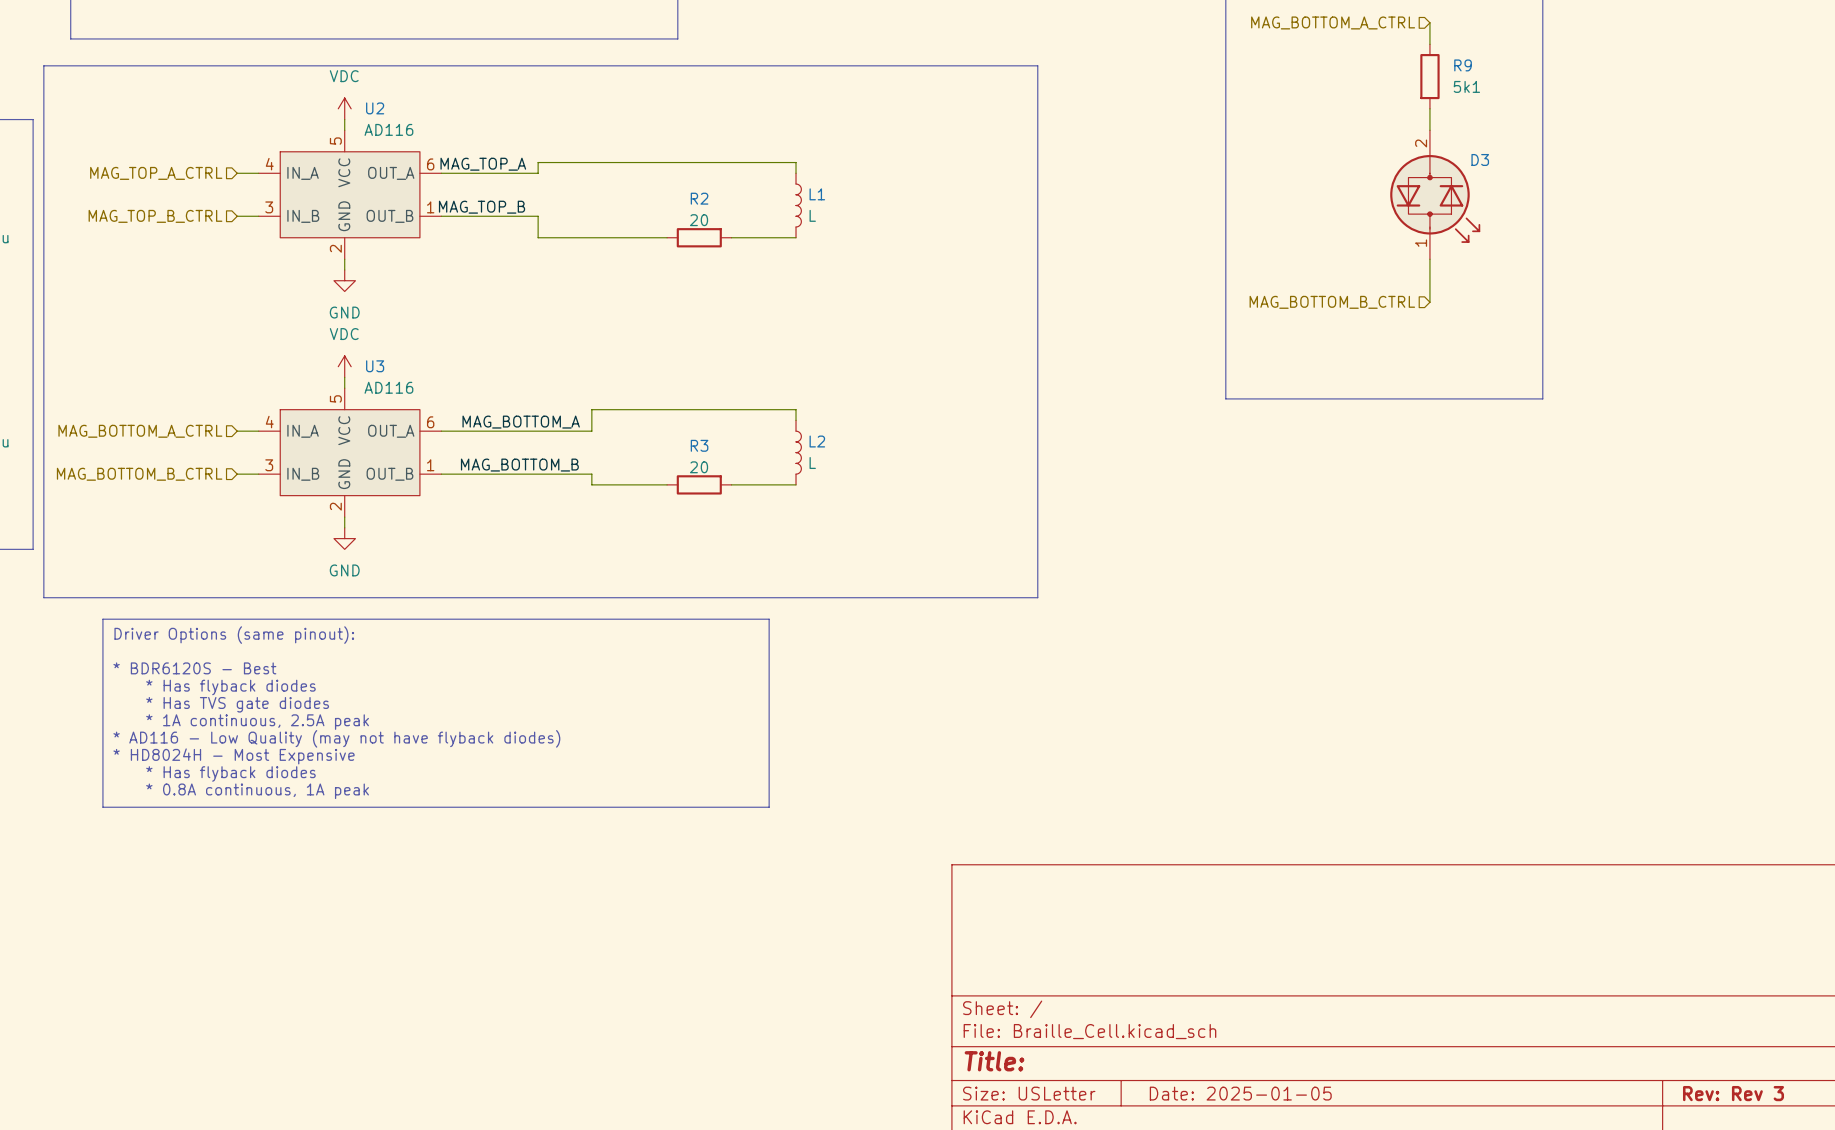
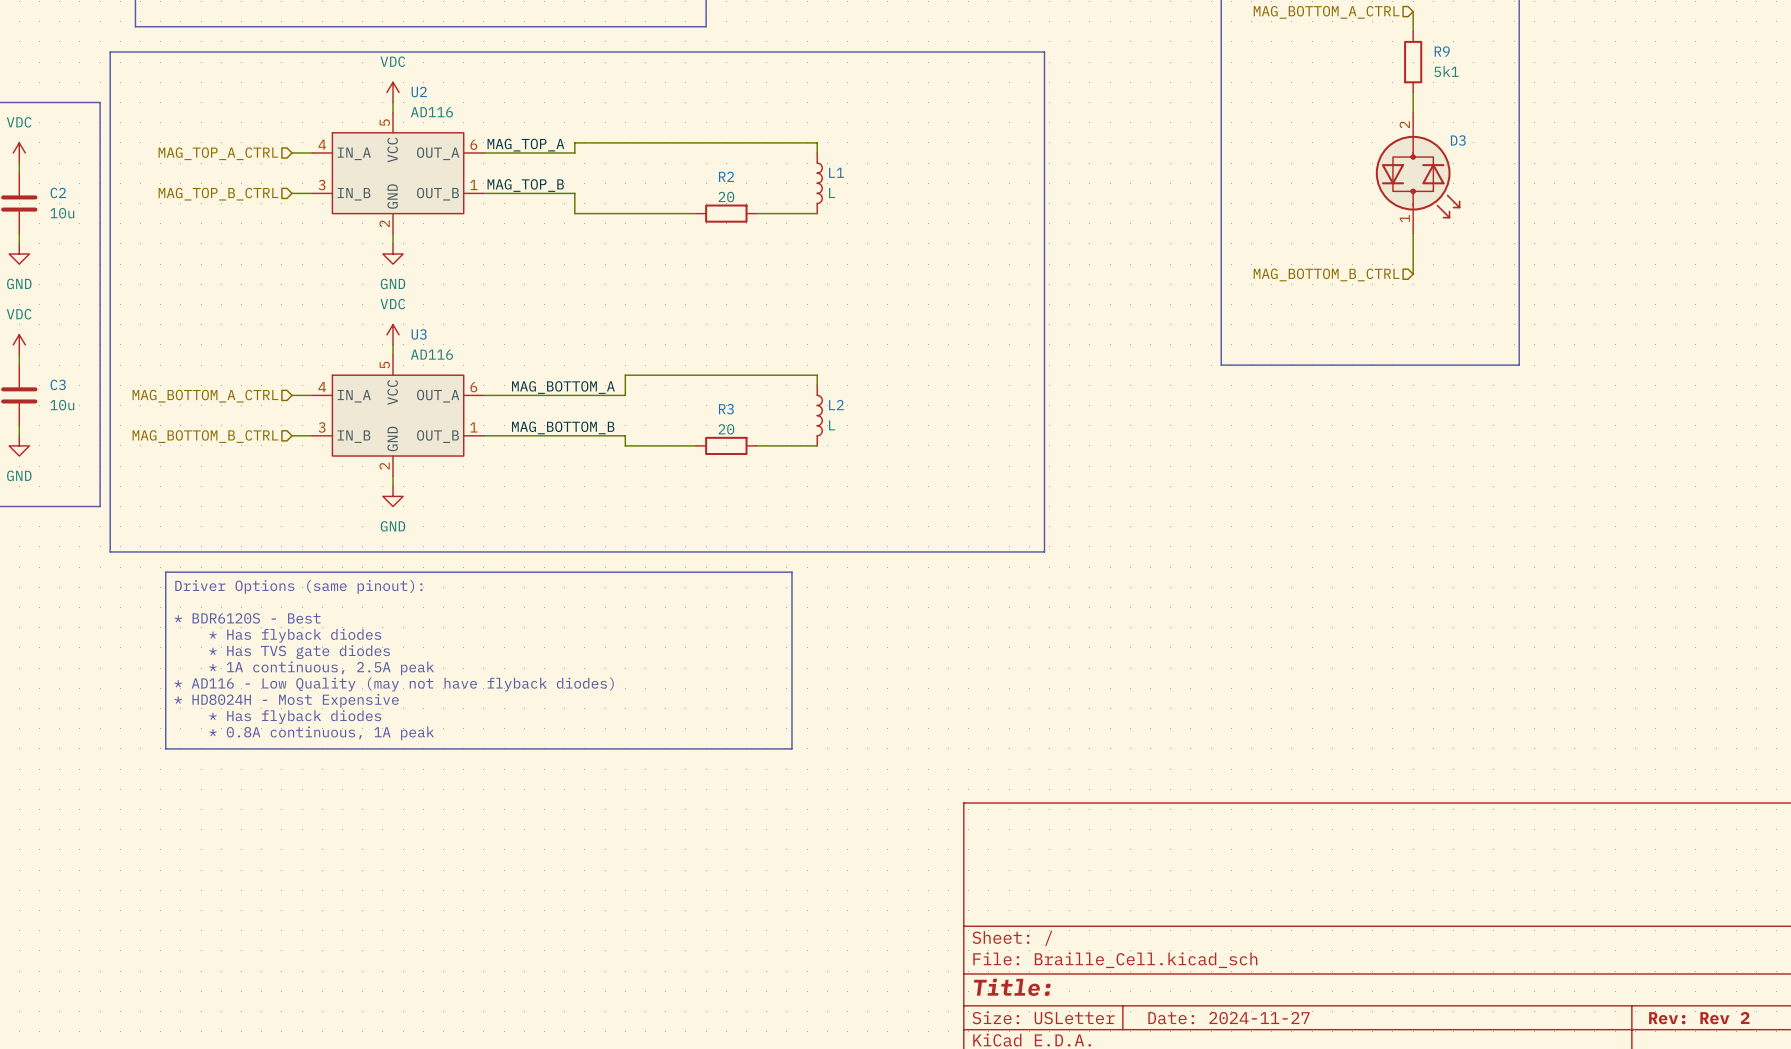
title block: Date: 2025-01-05 (1240, 1093) -> Date: 2024-11-27 (1228, 1018)
title block: Rev: Rev 3 (1733, 1093) -> Rev: Rev 2 (1699, 1018)

